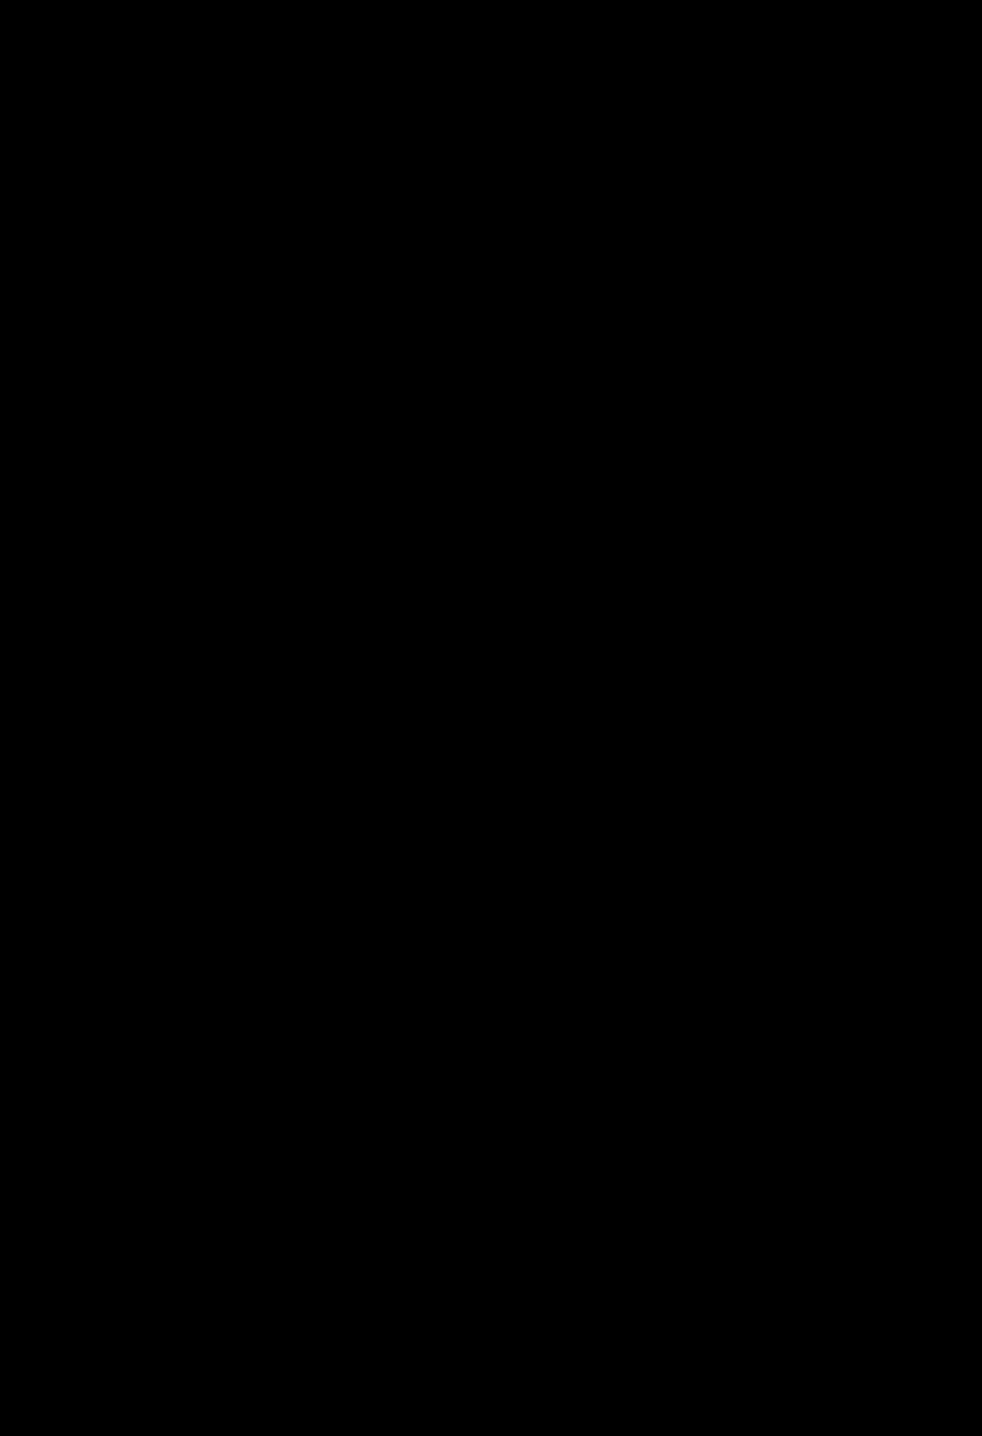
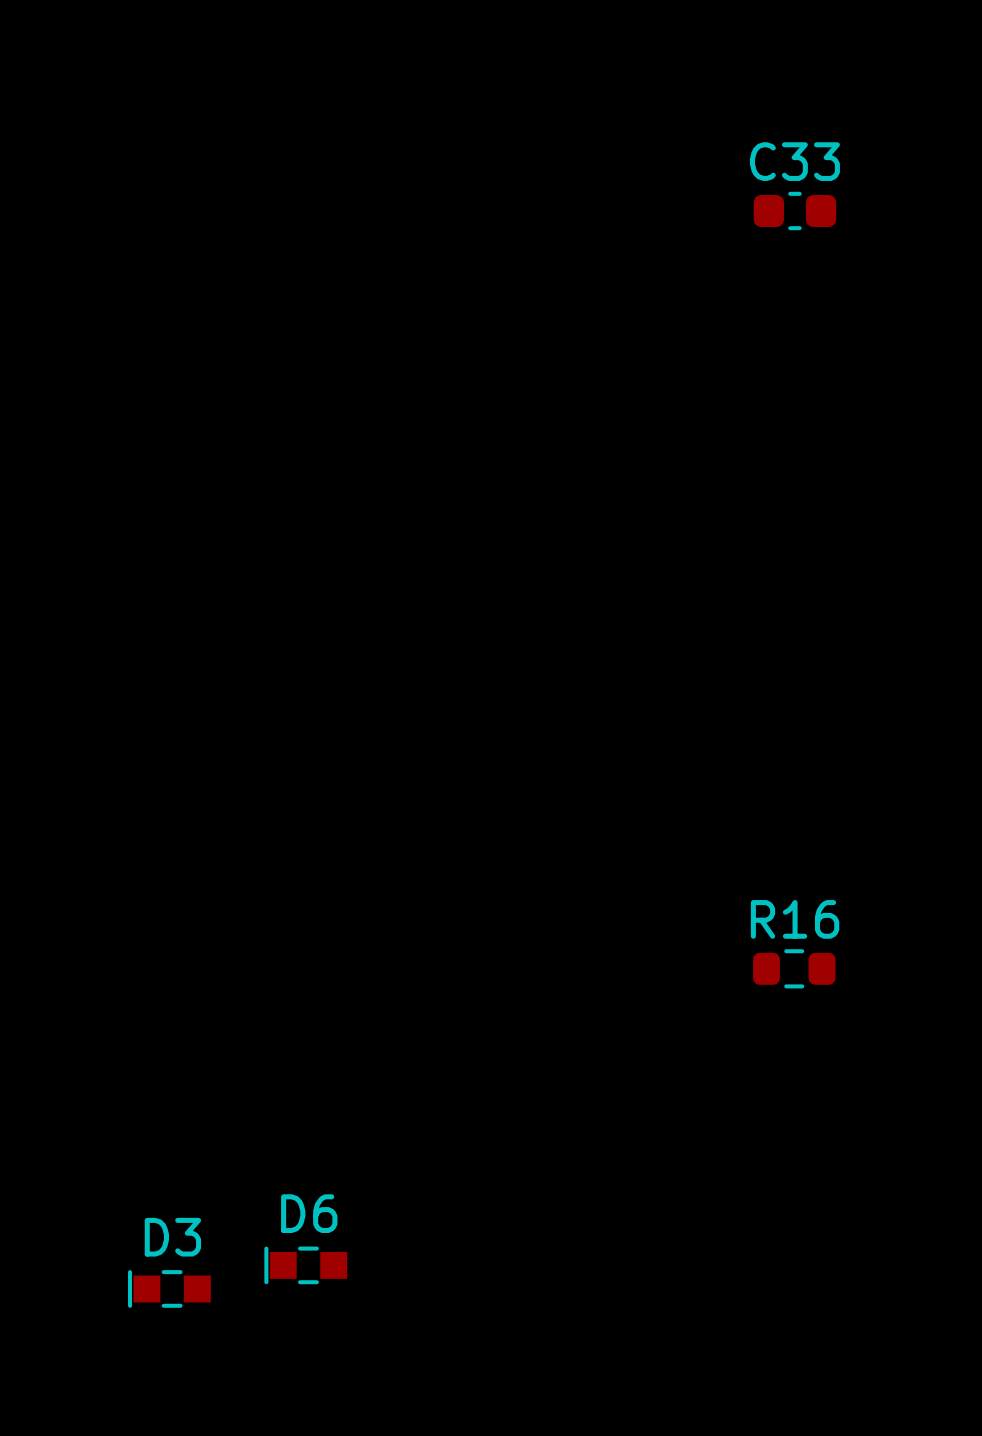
C33: none -> (794, 211)
R16: none -> (794, 968)
D6: none -> (305, 1265)
D3: none -> (169, 1288)

